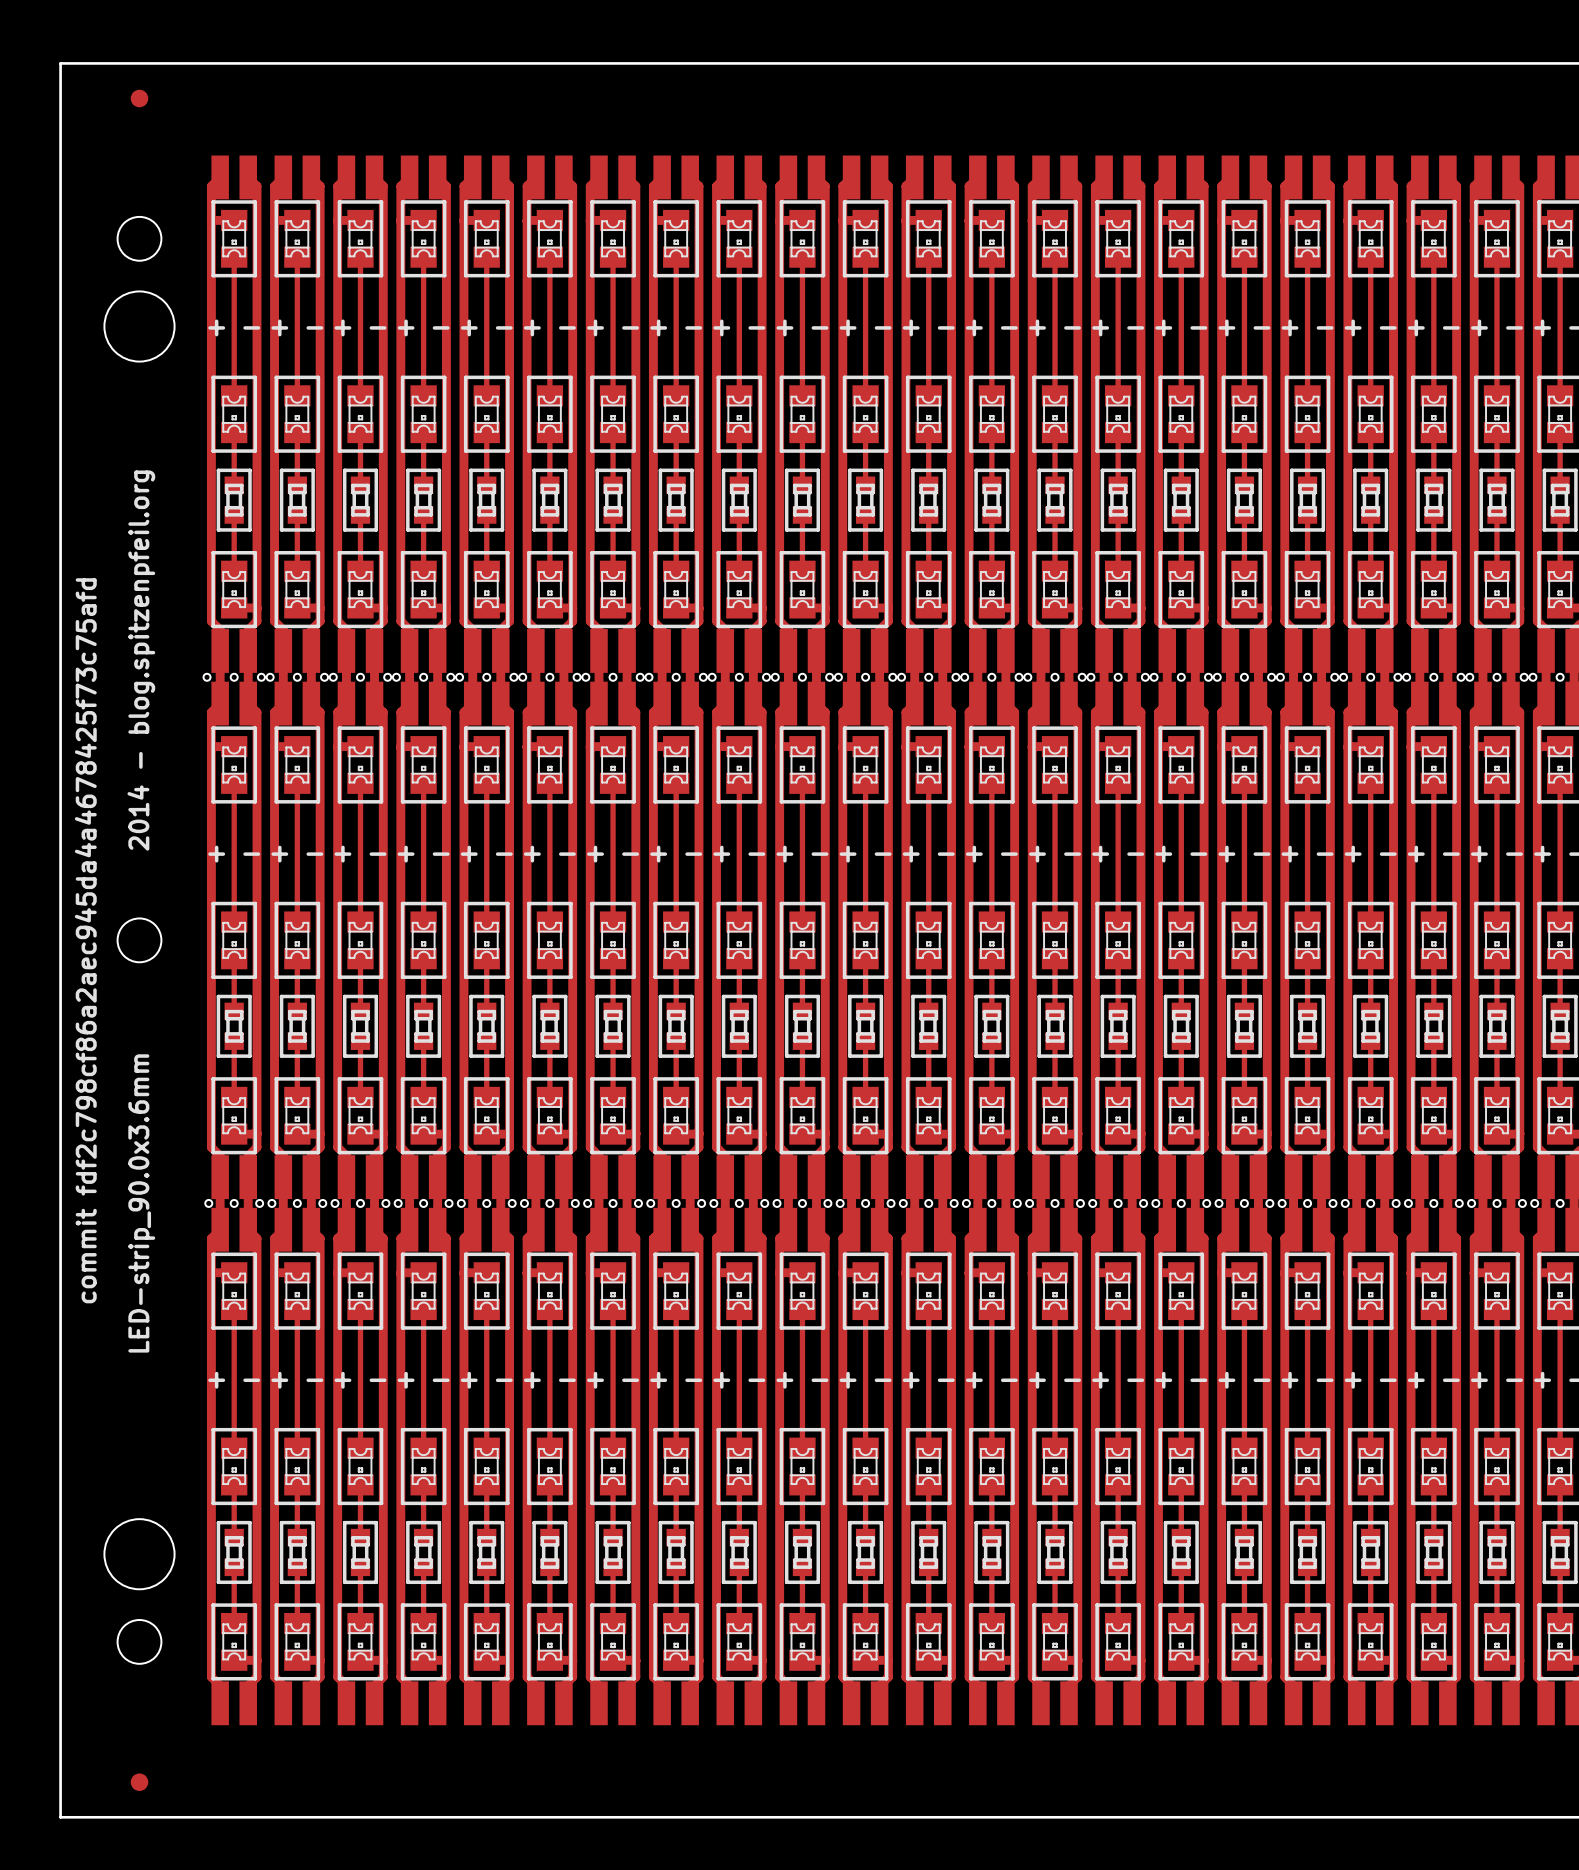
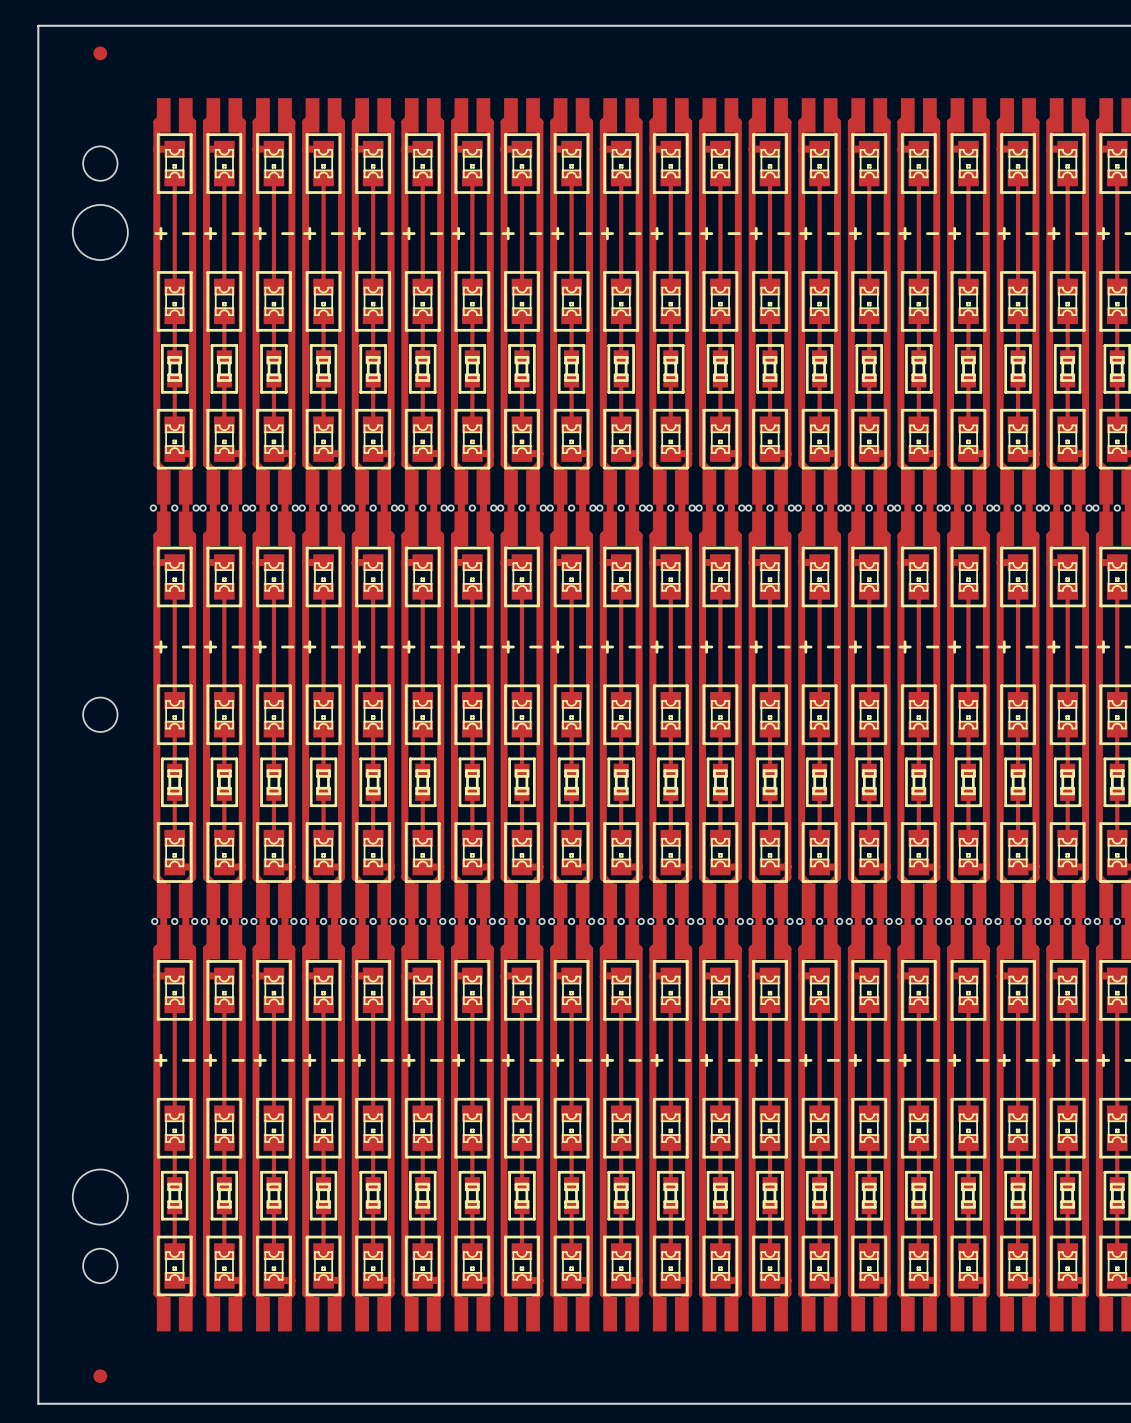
text: 2014 - blog.spitzenpfeil.org (141, 660) -> none
text: commit fdf2c798cf86a2aec945da4a4678425f73c75afd (85, 940) -> none
text: LED-strip_90.0x3.6mm (141, 1203) -> none

